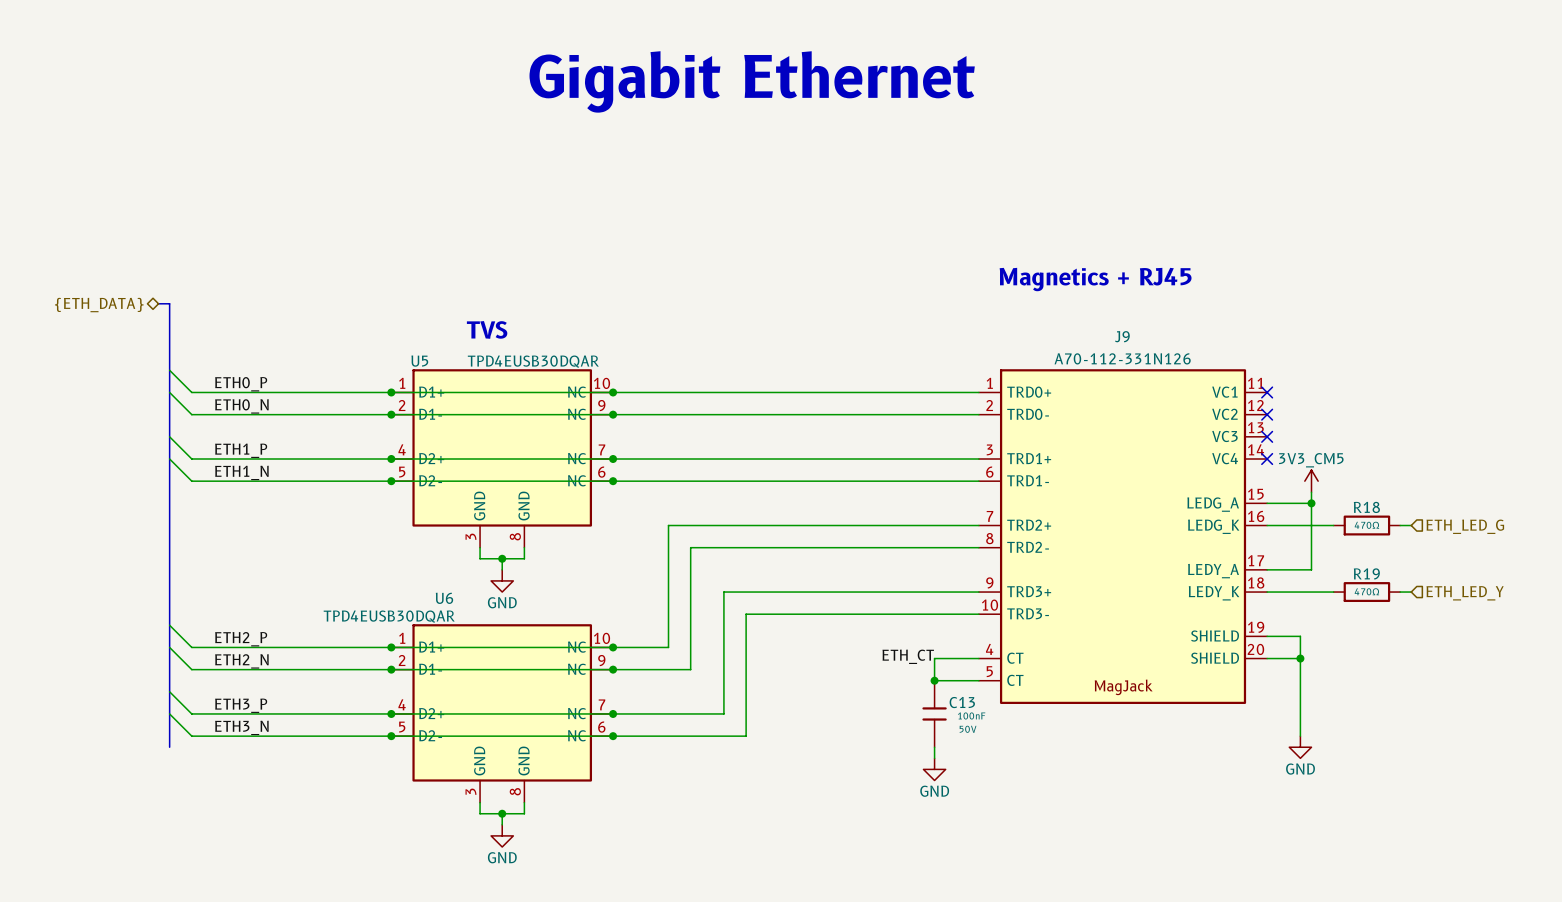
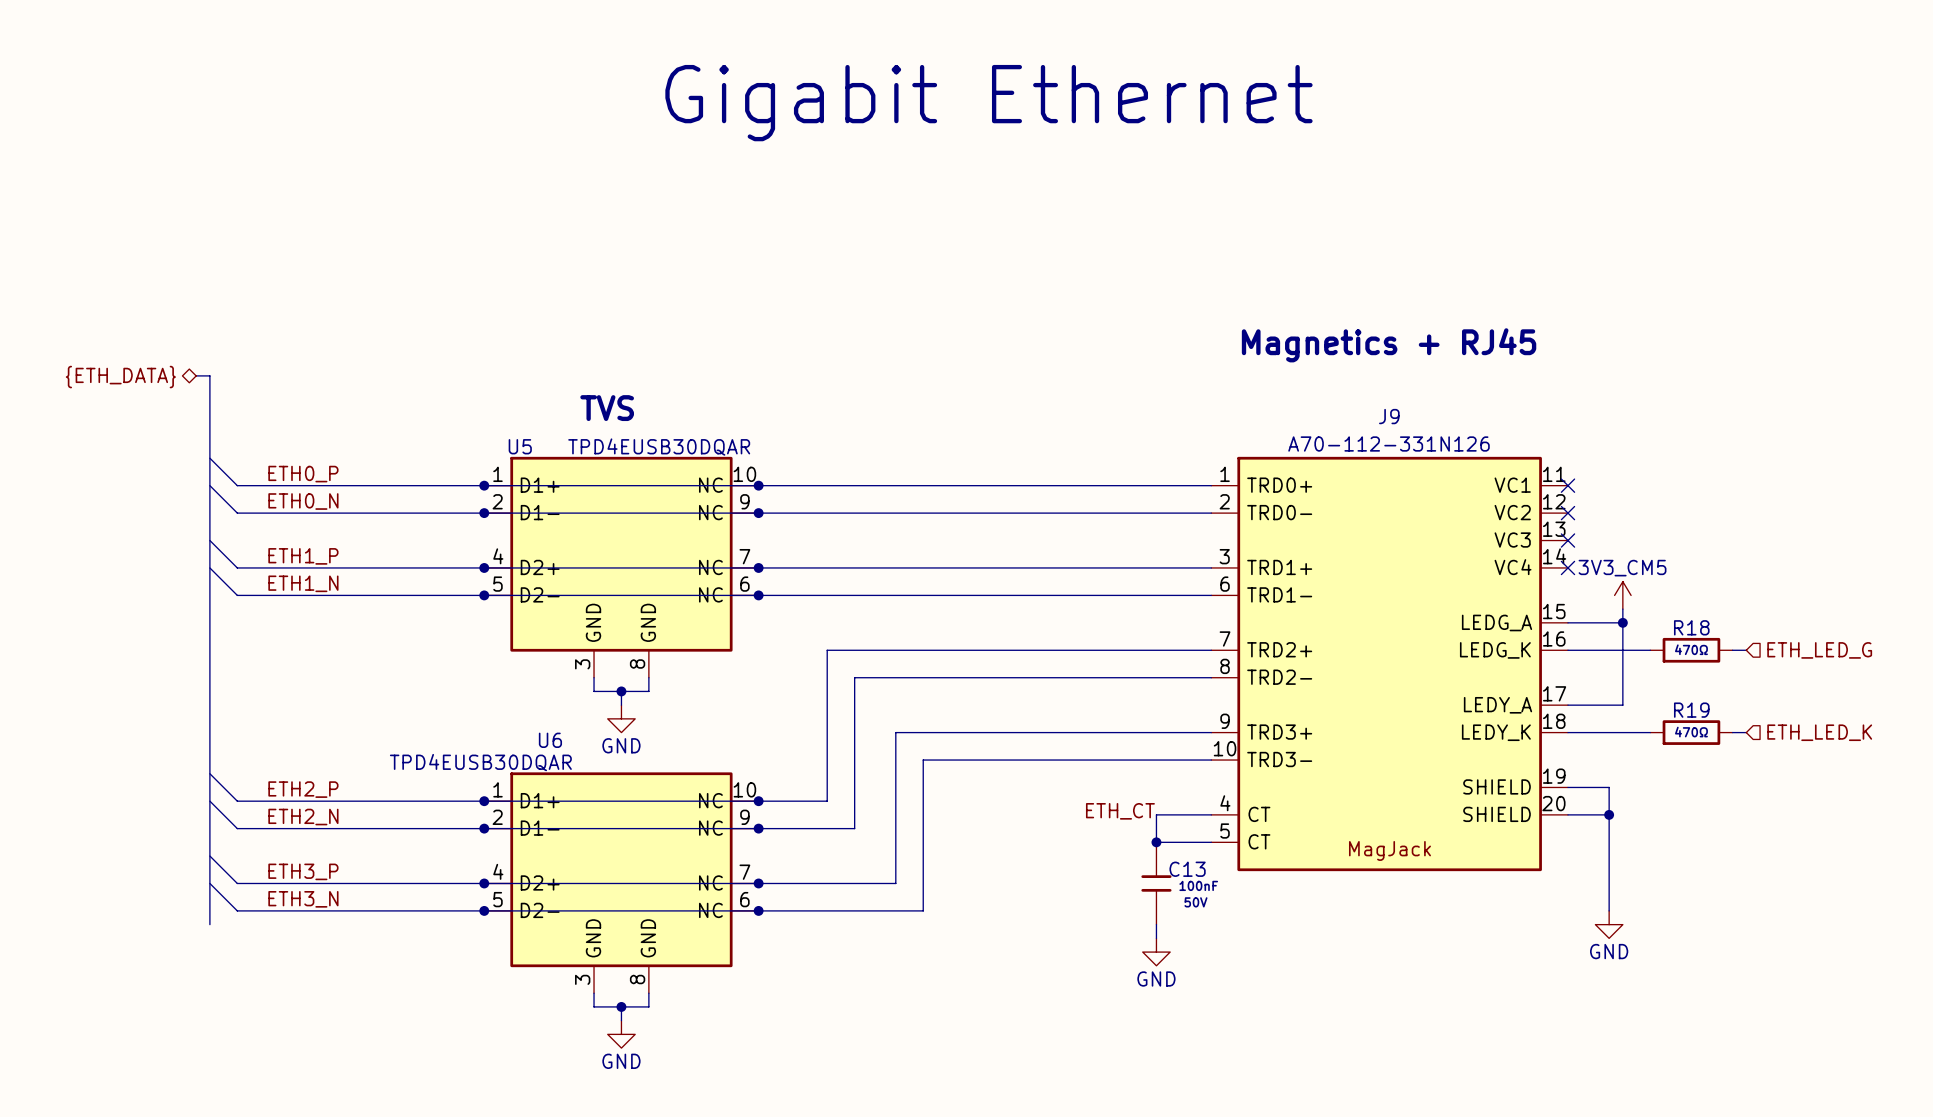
hierarchical label: ETH_LED_Y (1465, 593) -> ETH_LED_K (1819, 732)

